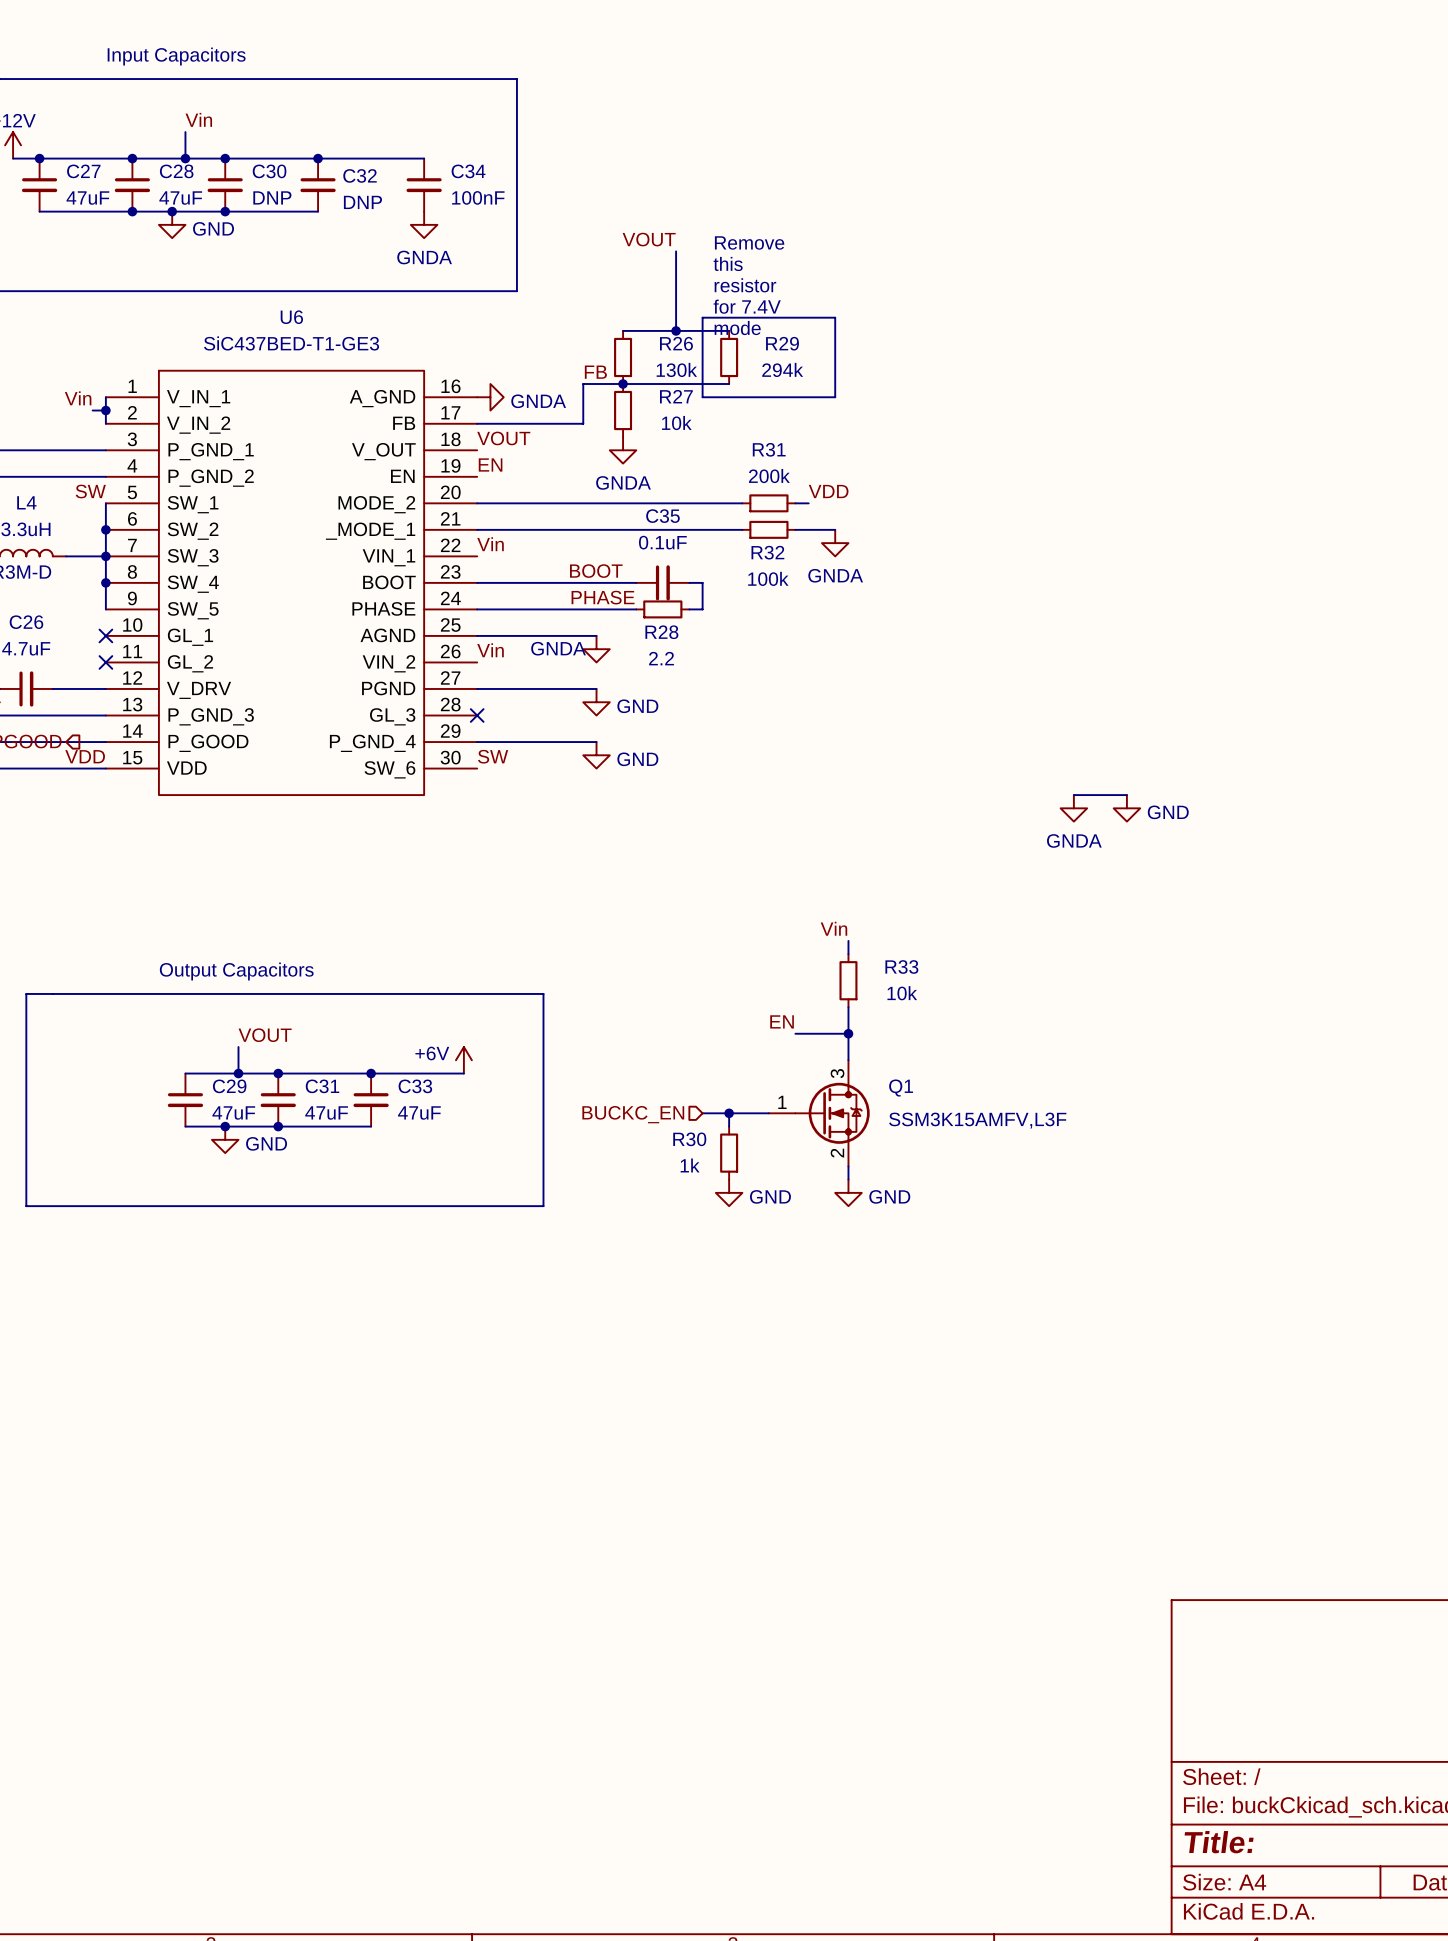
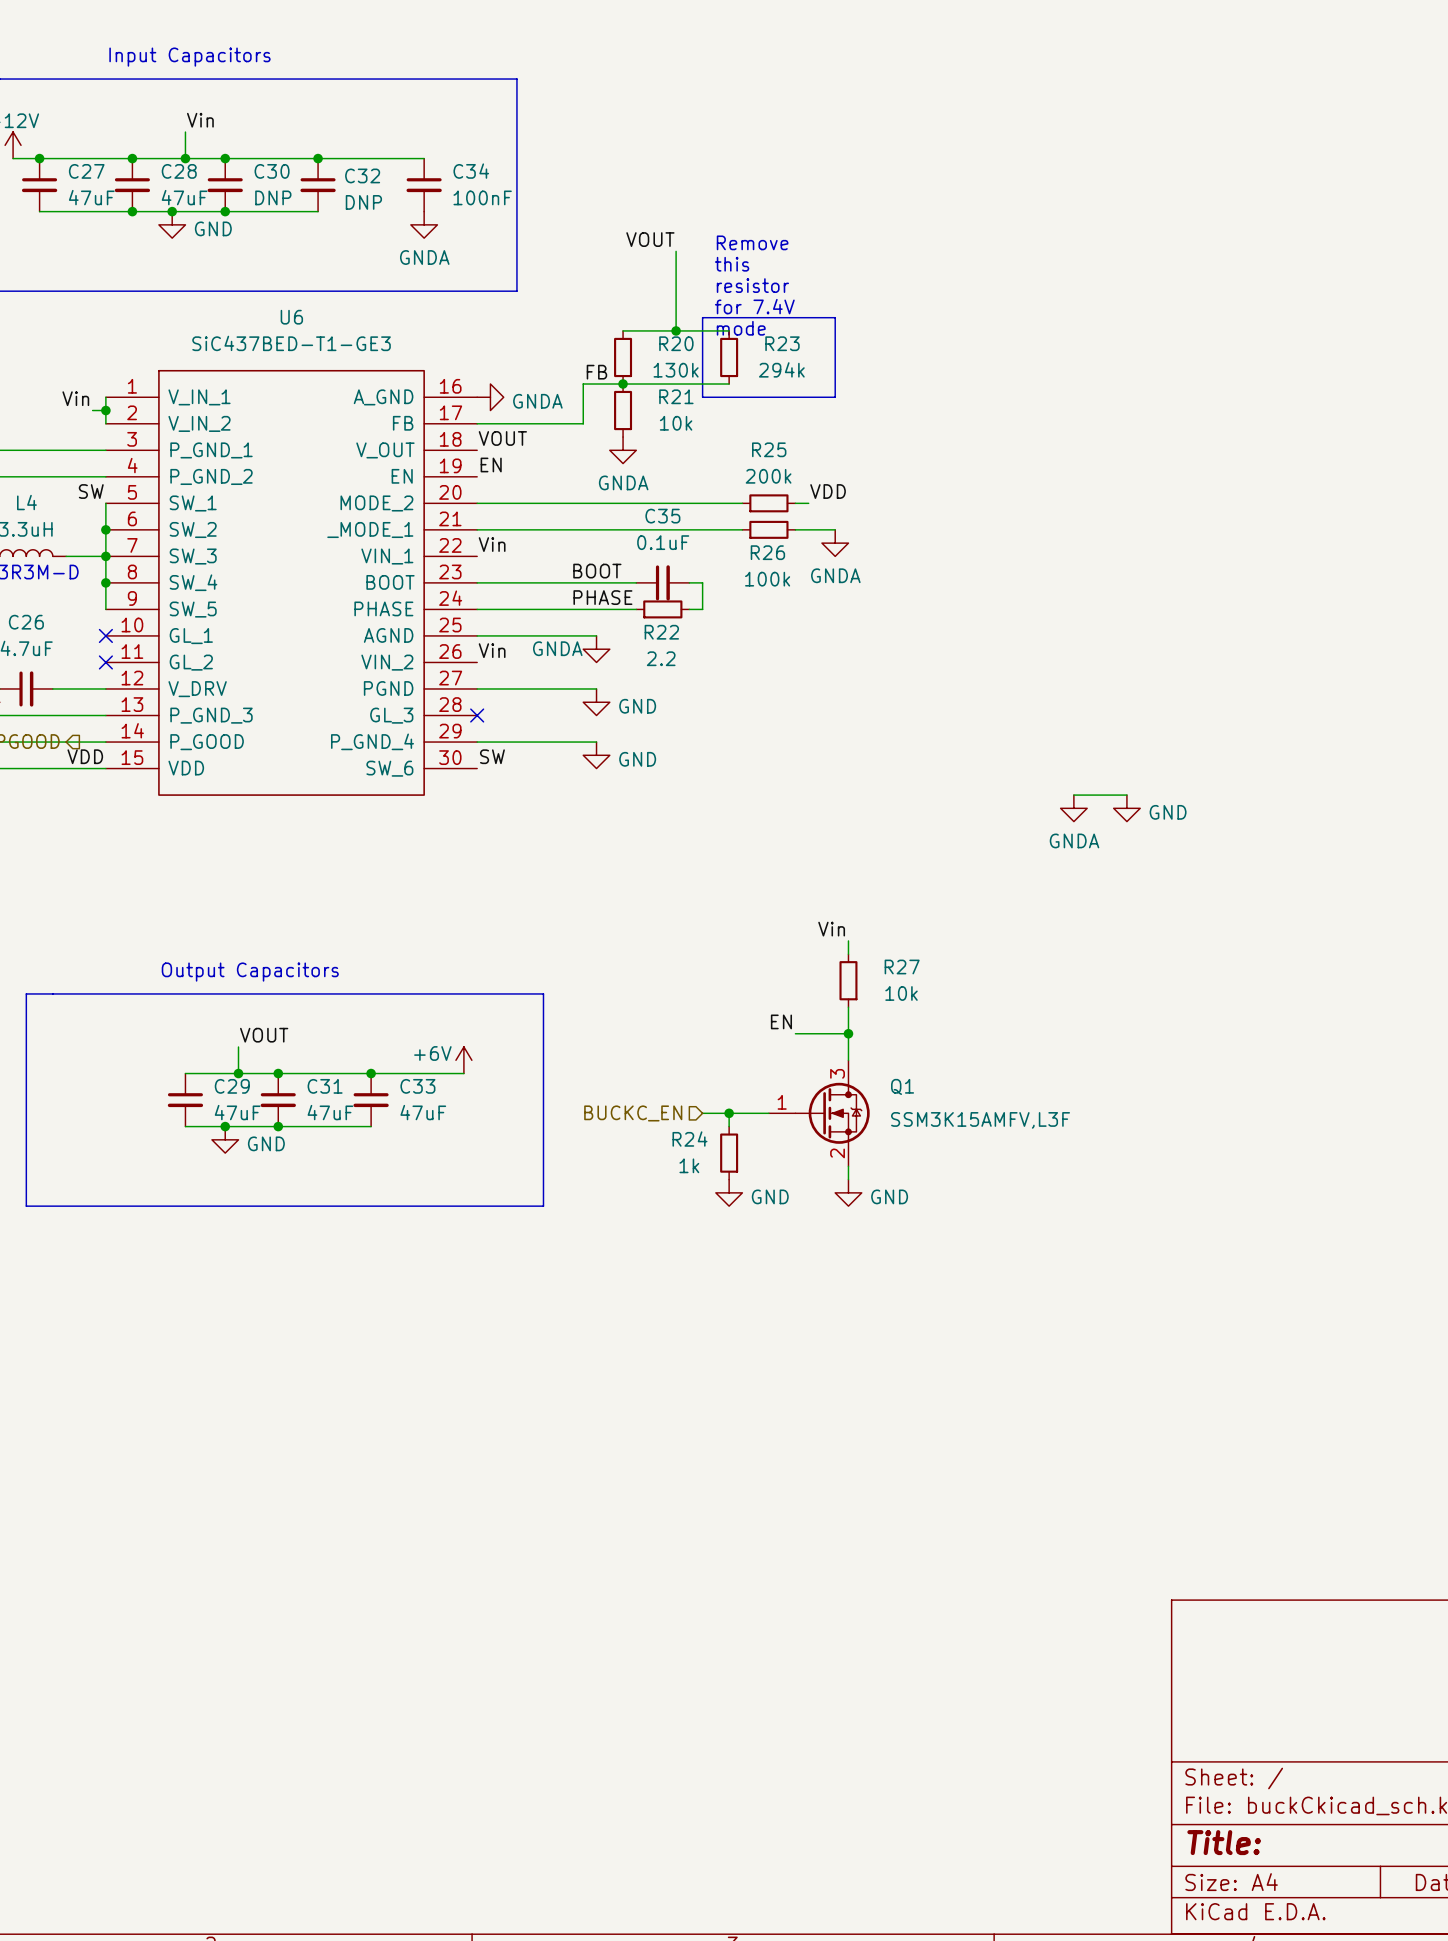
R26 name: R26 (676, 343) -> R20 (676, 343)
R29 name: R29 (782, 343) -> R23 (782, 343)
R27 name: R27 (676, 396) -> R21 (676, 396)
R31 name: R31 (769, 449) -> R25 (769, 449)
R32 name: R32 (767, 552) -> R26 (767, 552)
R28 name: R28 (661, 632) -> R22 (661, 632)
R33 name: R33 (901, 966) -> R27 (902, 966)
R30 name: R30 (689, 1139) -> R24 (689, 1139)

